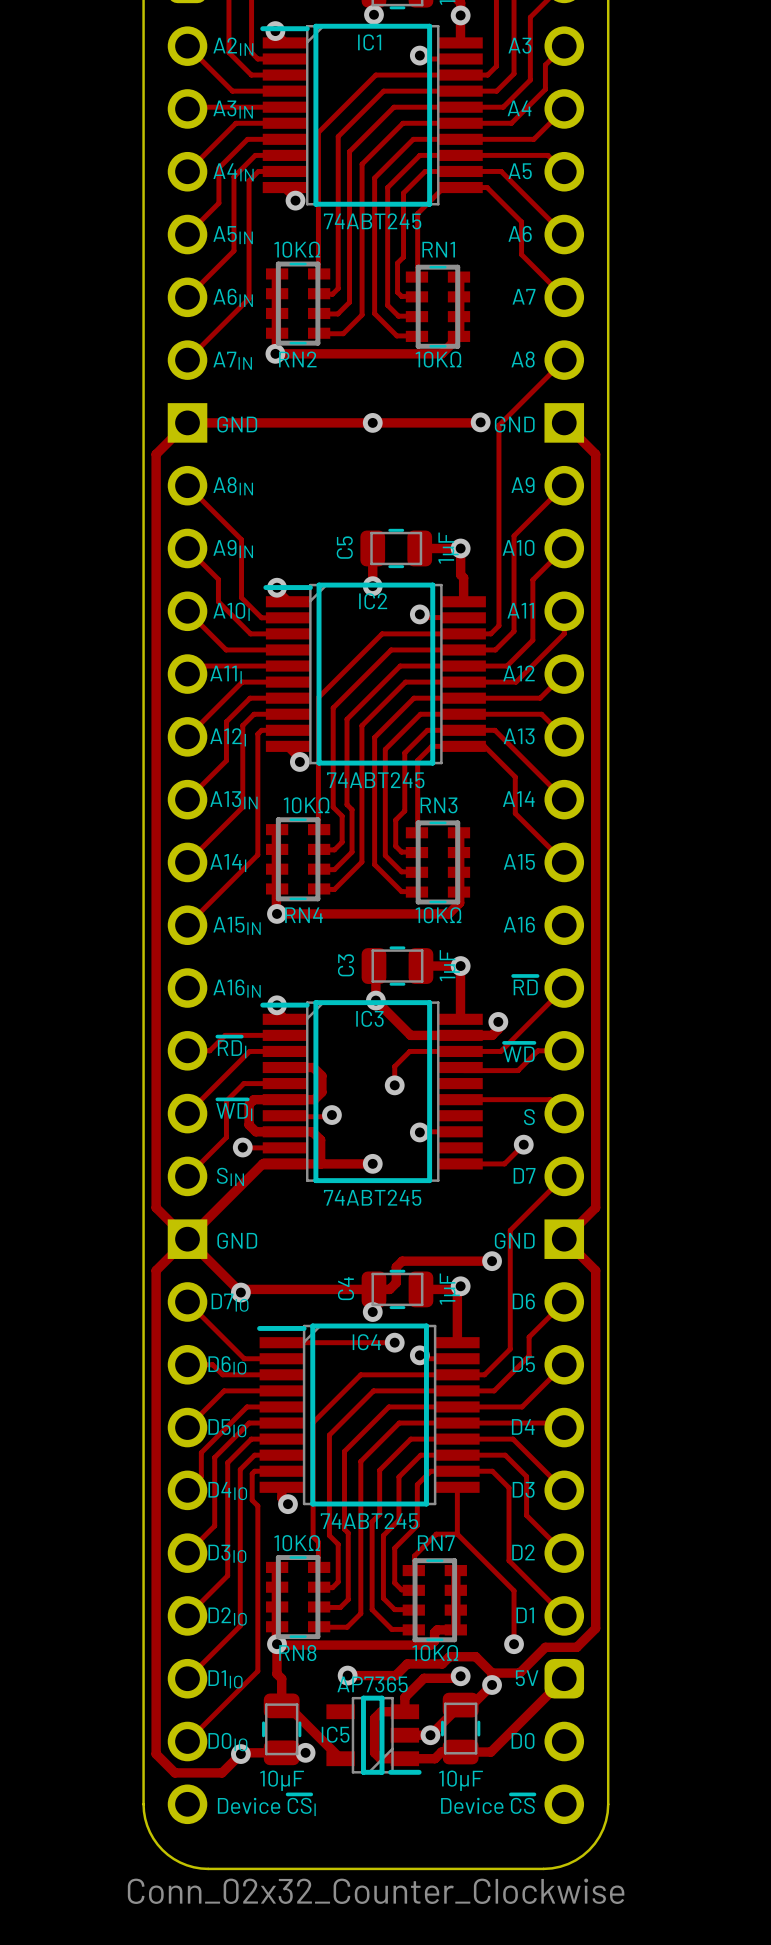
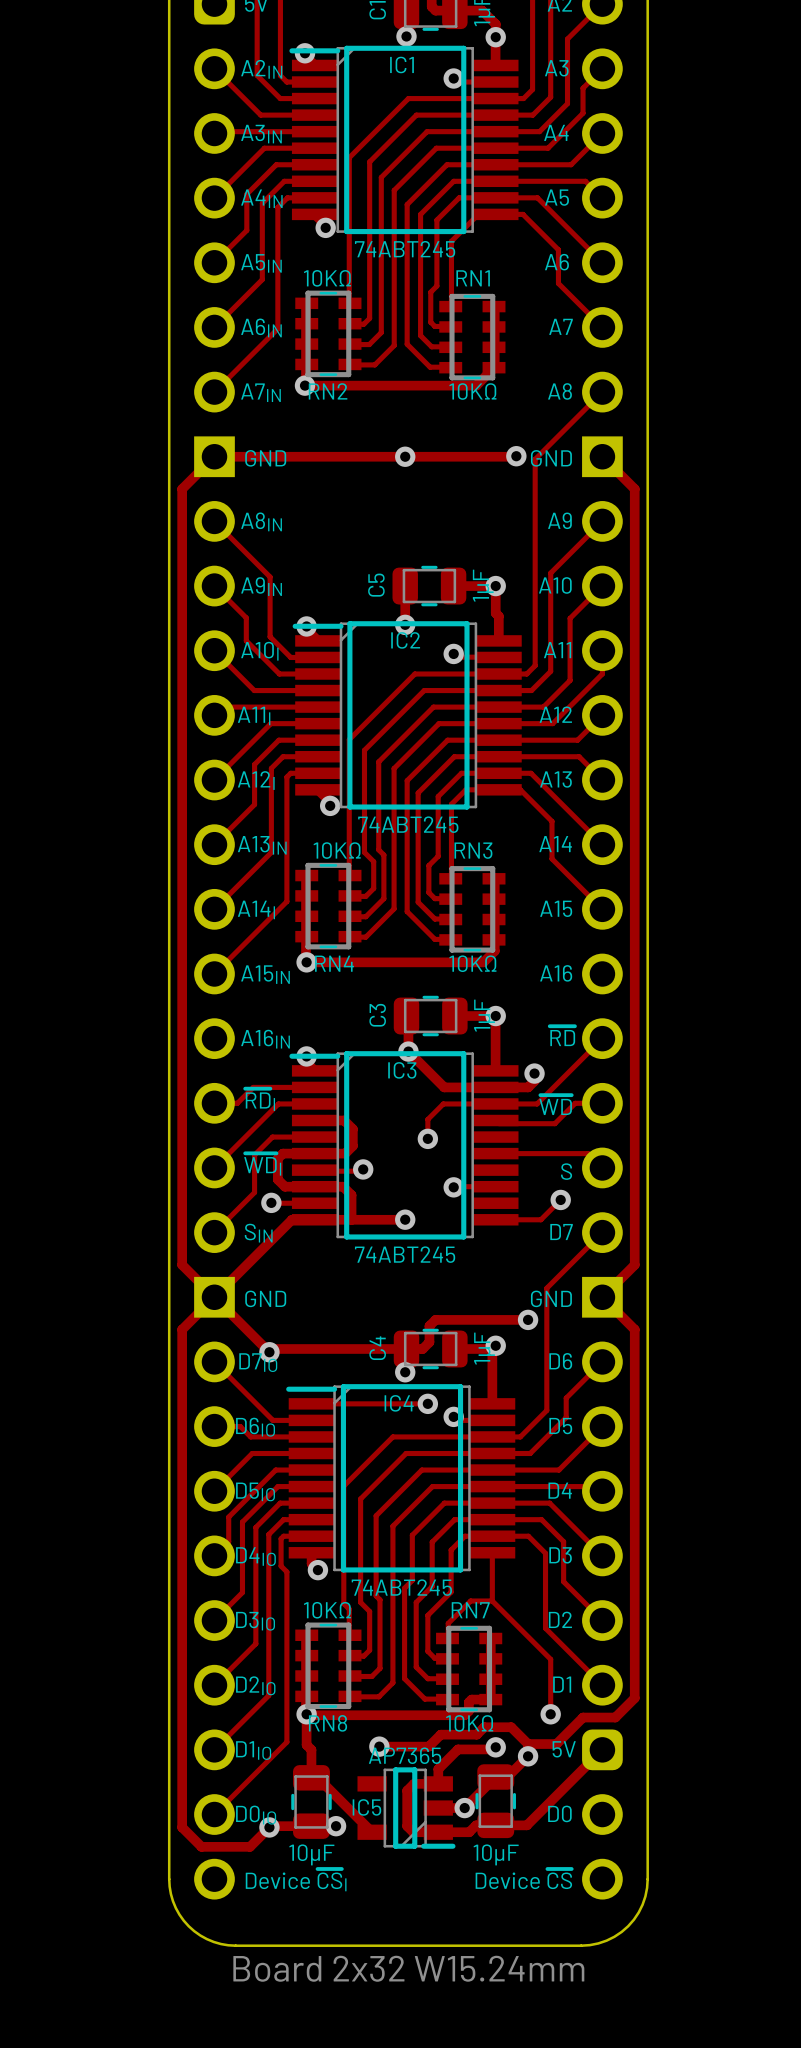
part value: Conn_02x32_Counter_Clockwise (376, 1891) -> Board 2x32 W15.24mm (408, 1968)

